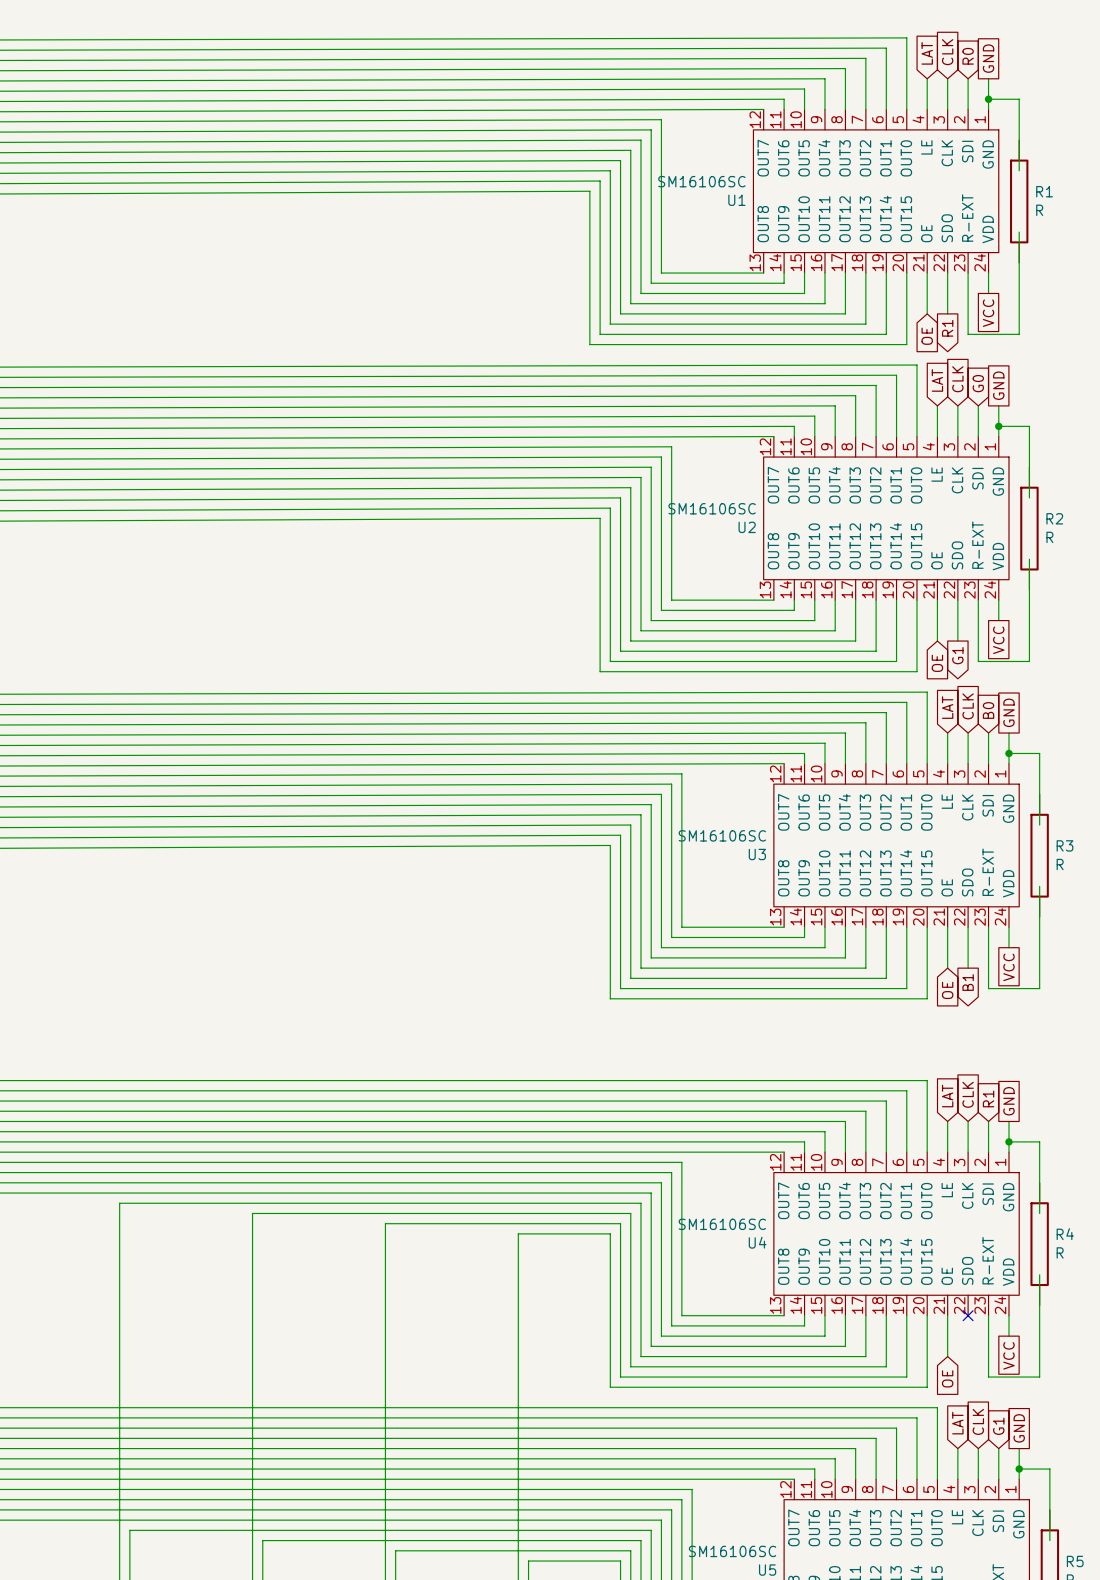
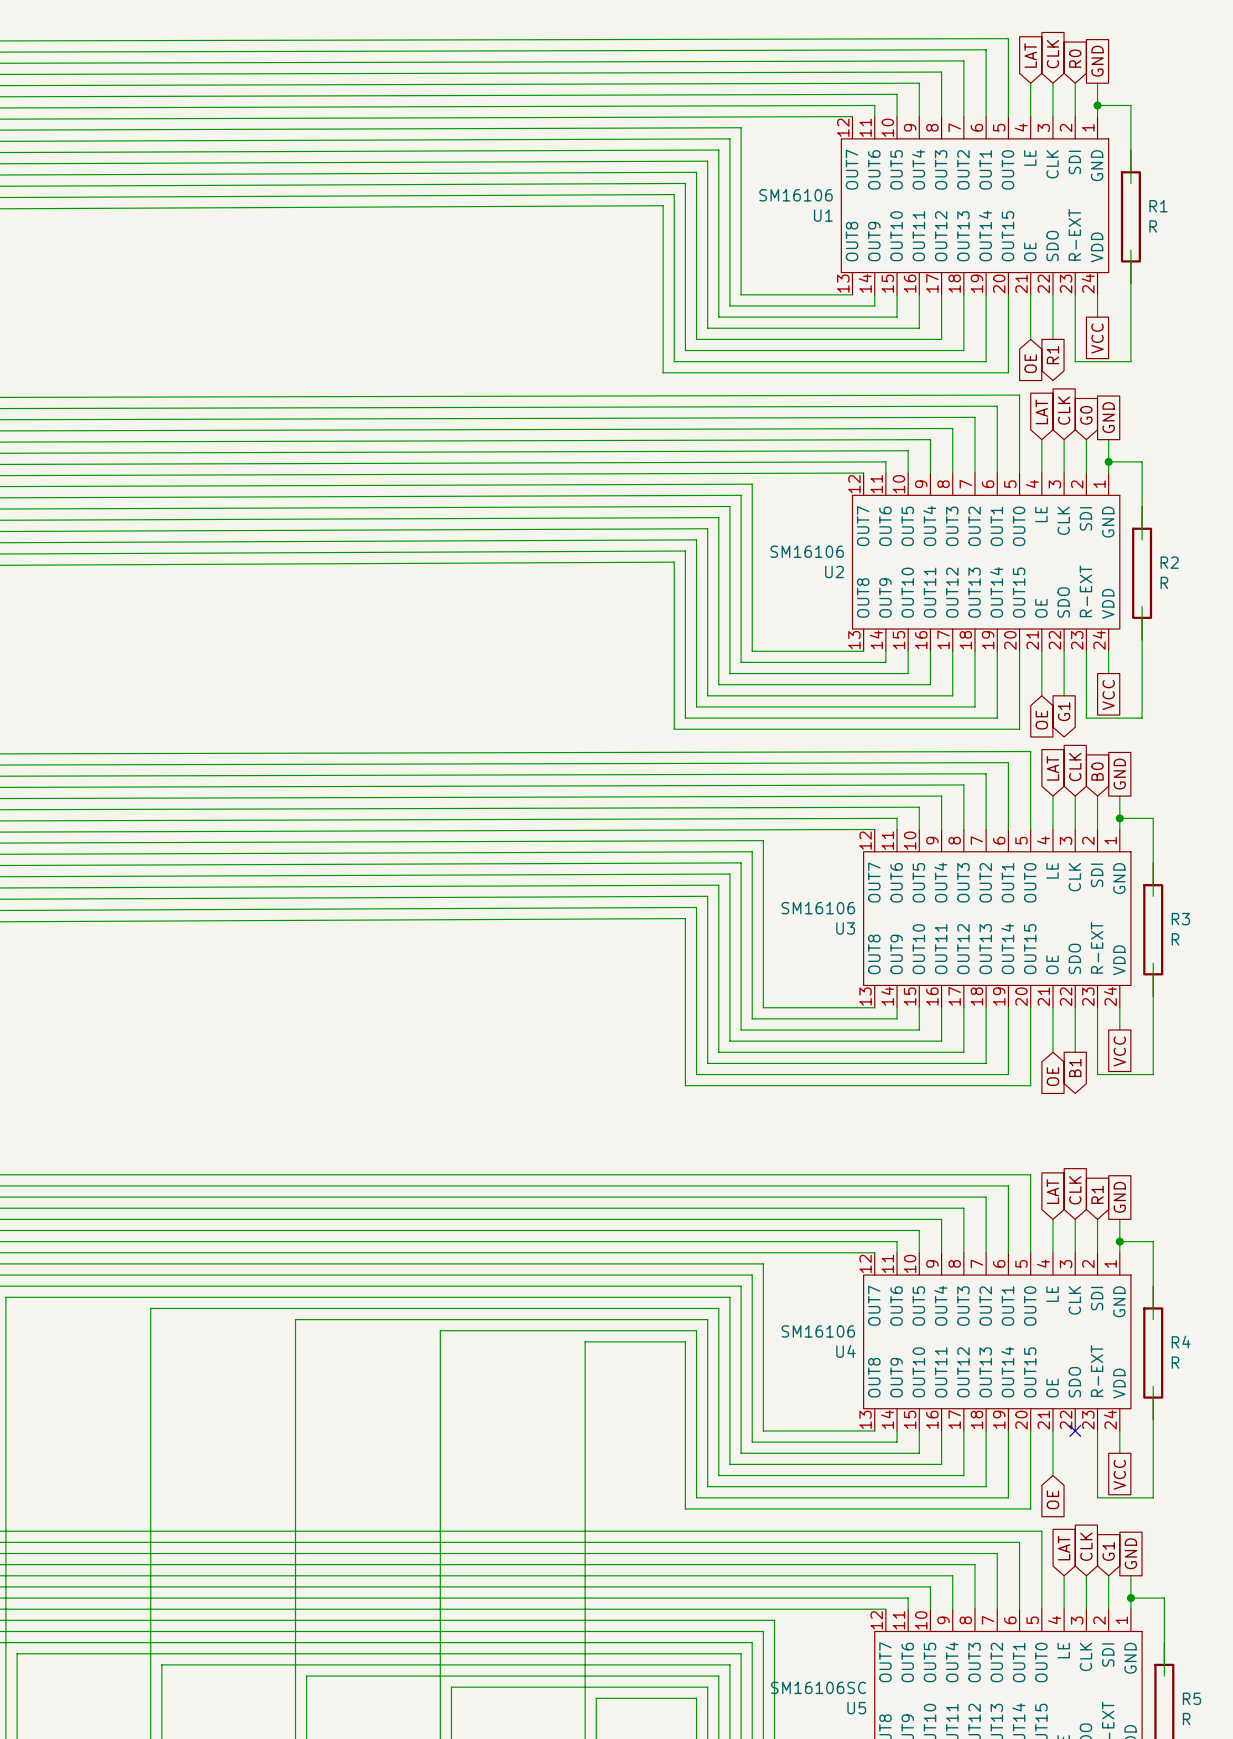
U1 value: SM16106SC (701, 181) -> SM16106 (796, 195)
U2 value: SM16106SC (712, 508) -> SM16106 (807, 551)
U3 value: SM16106SC (722, 835) -> SM16106 (818, 908)
U4 value: SM16106SC (722, 1224) -> SM16106 (818, 1331)

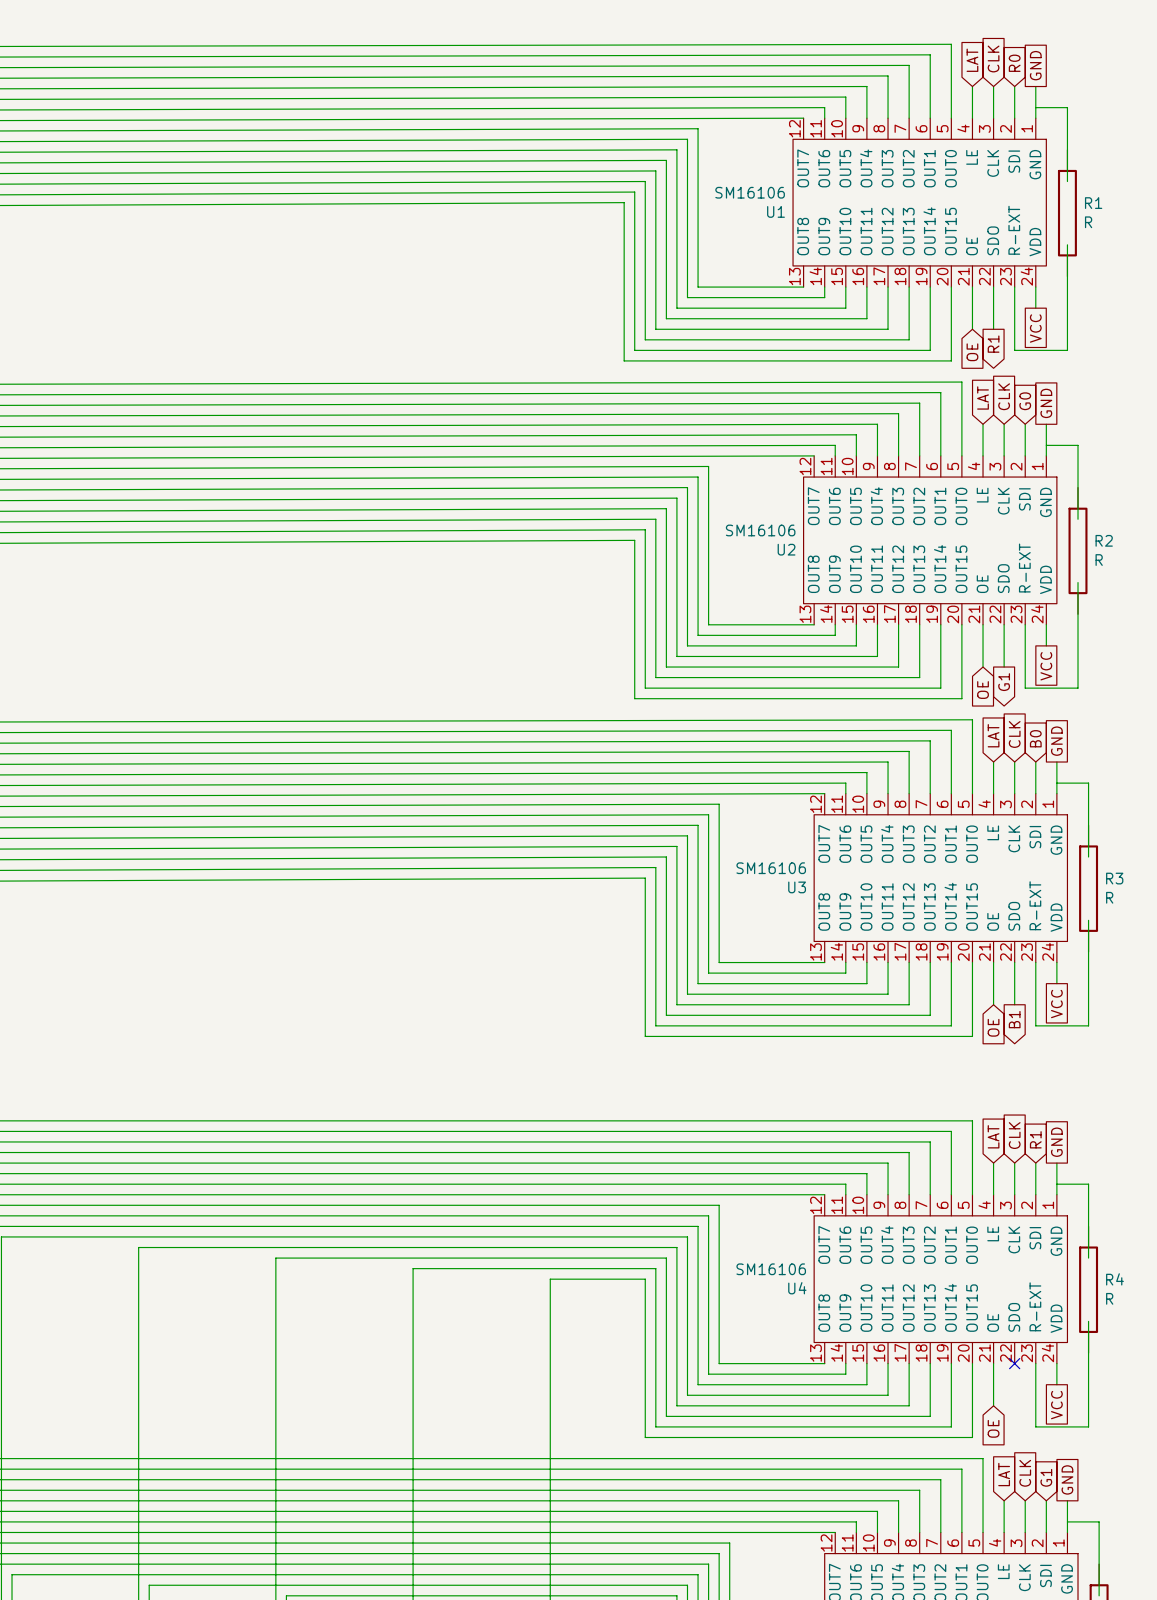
junction: (1097, 105) -> none
junction: (1108, 461) -> none
junction: (1119, 818) -> none
junction: (1119, 1241) -> none
junction: (1130, 1598) -> none

